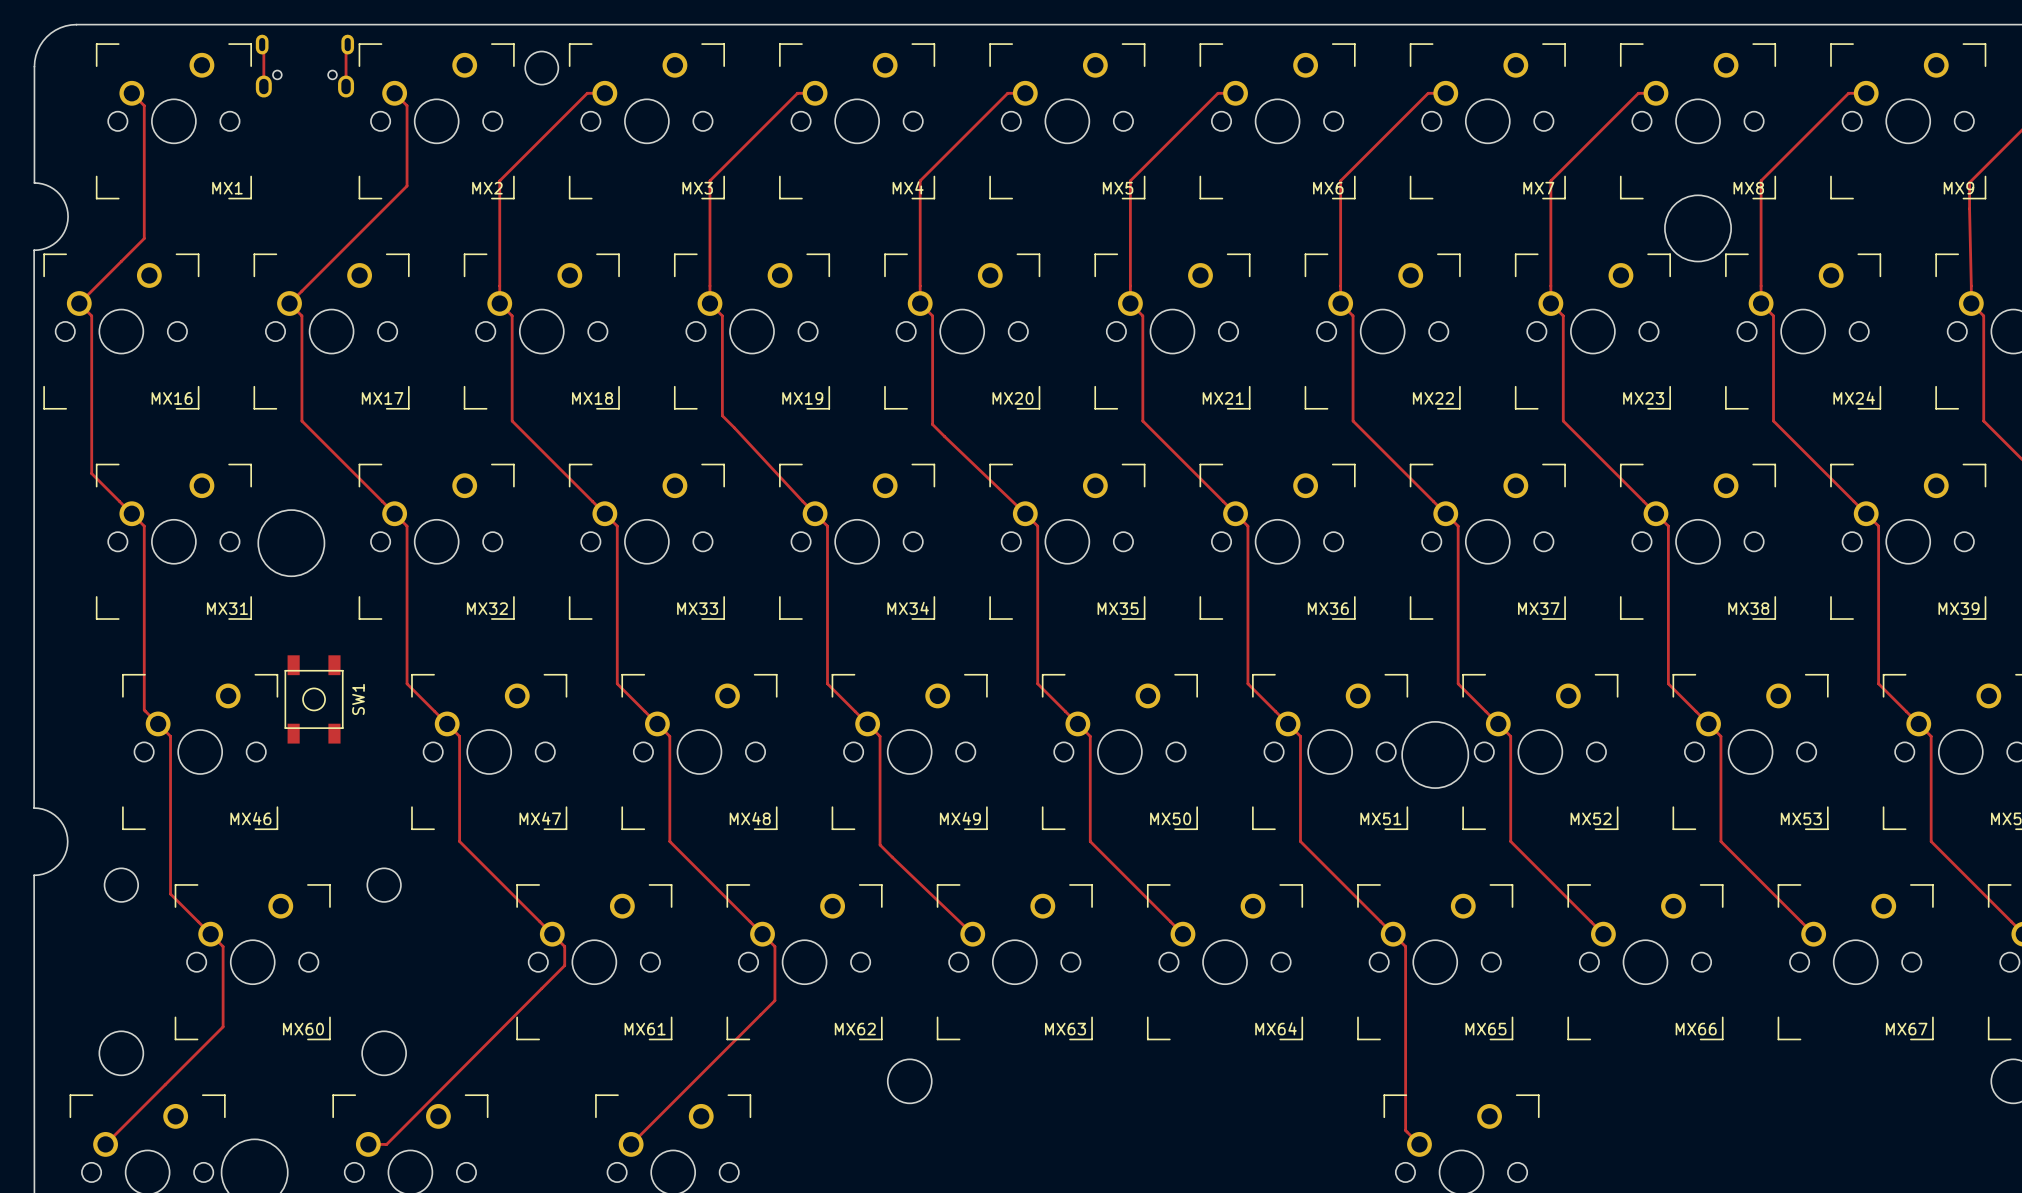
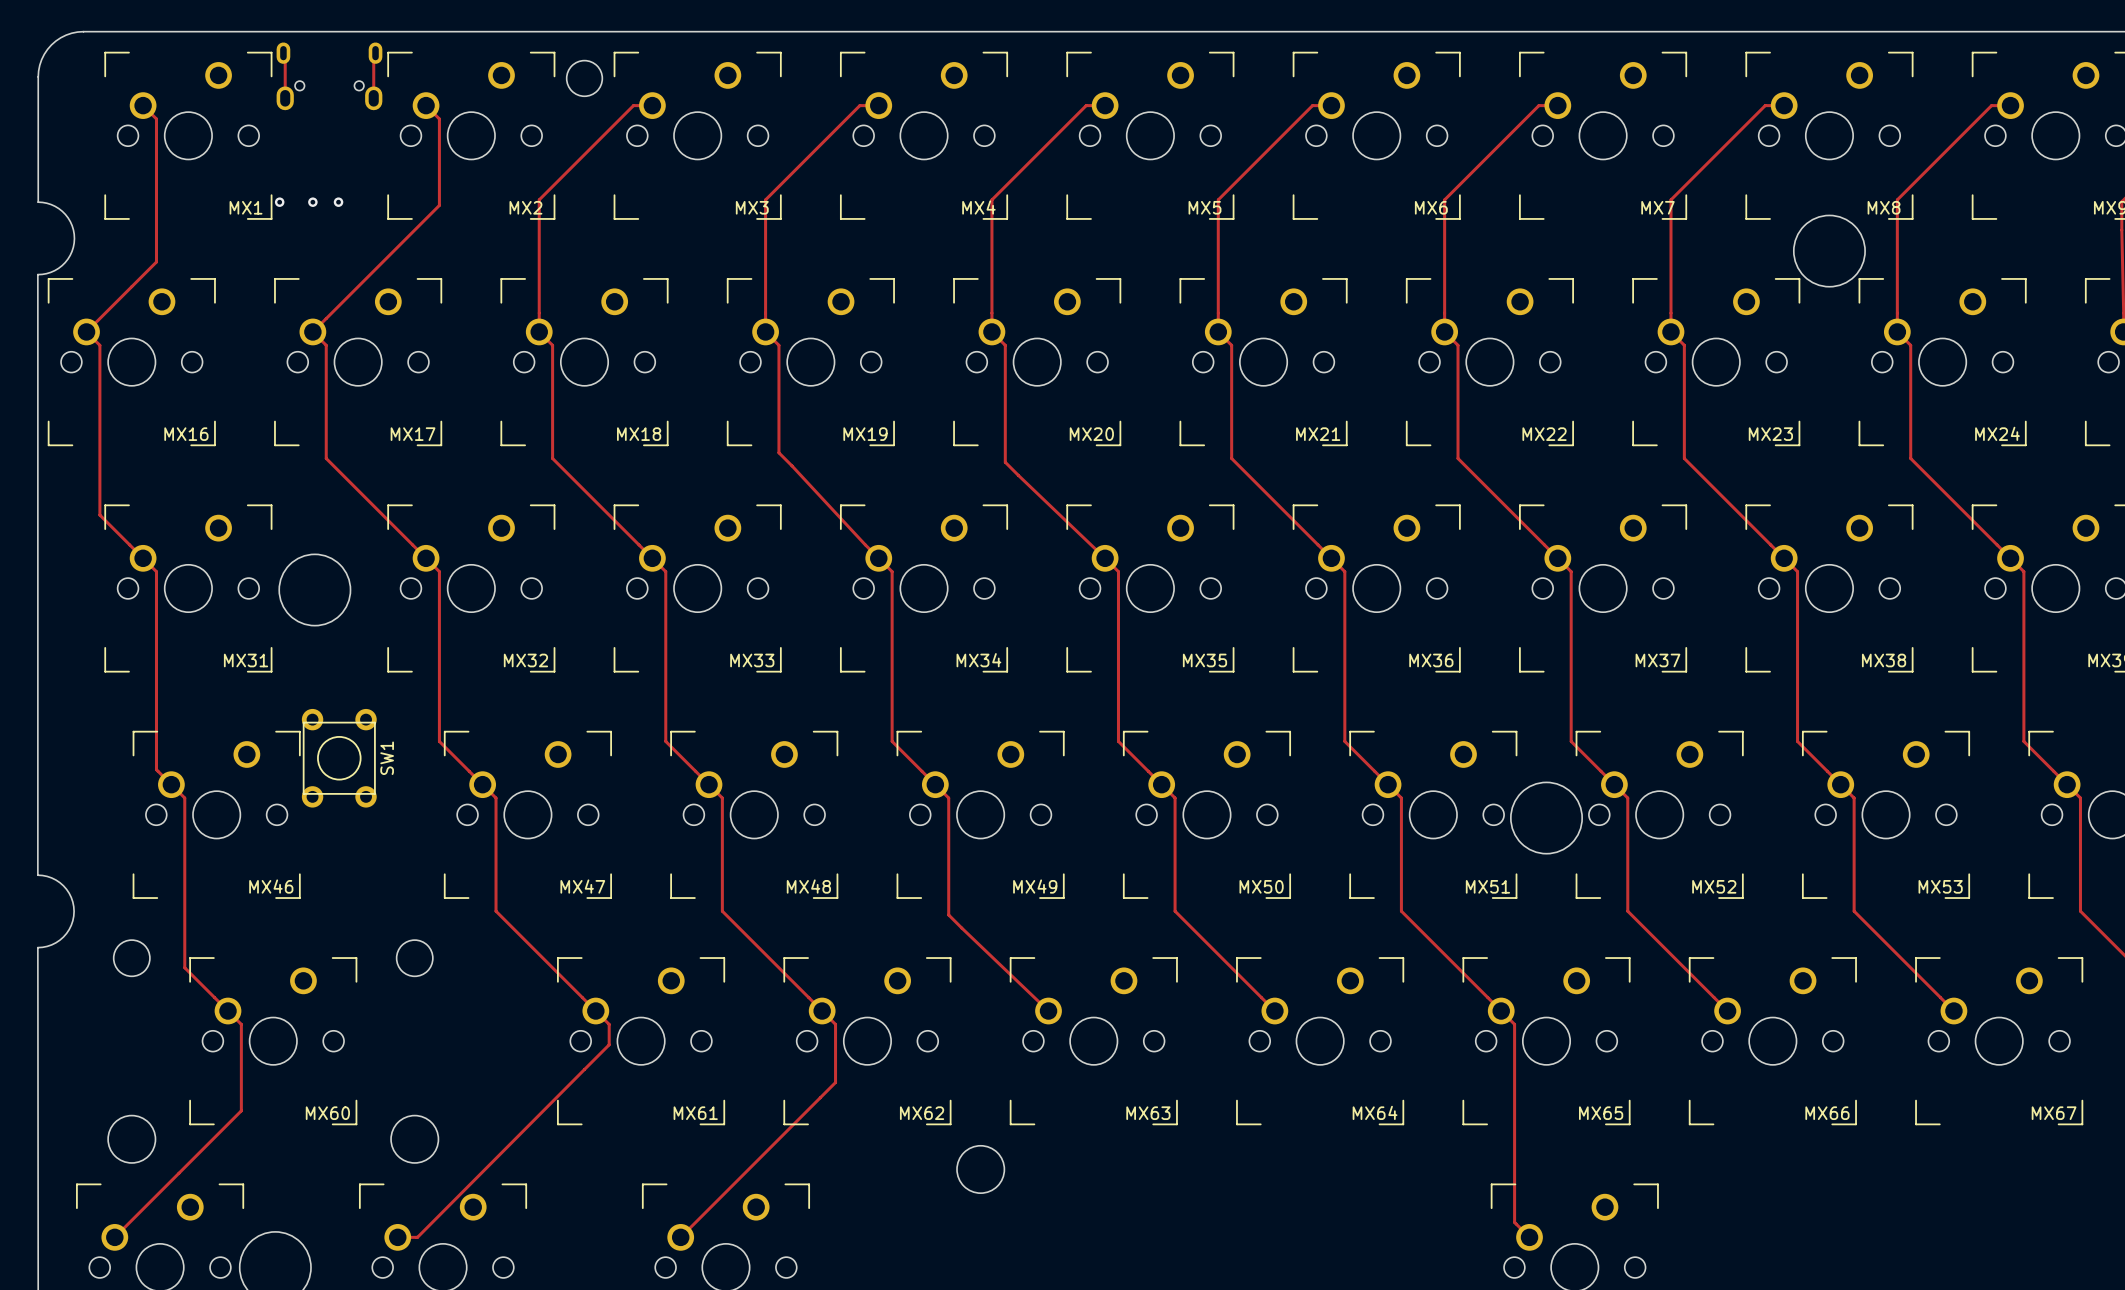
via: none -> (279, 202)
via: none -> (312, 202)
via: none -> (338, 202)
SW1 footprint: [284, 655, 344, 744] -> [301, 708, 377, 808]

